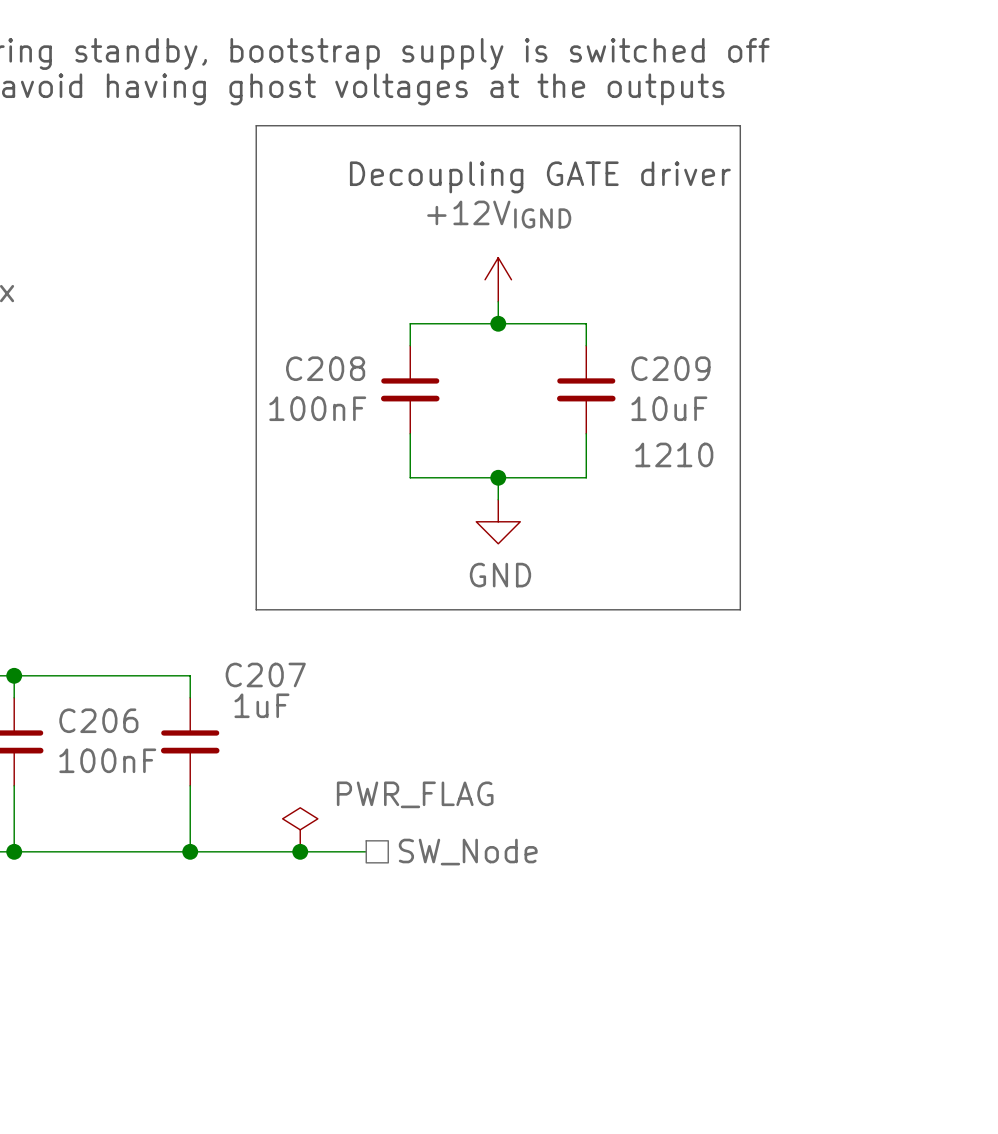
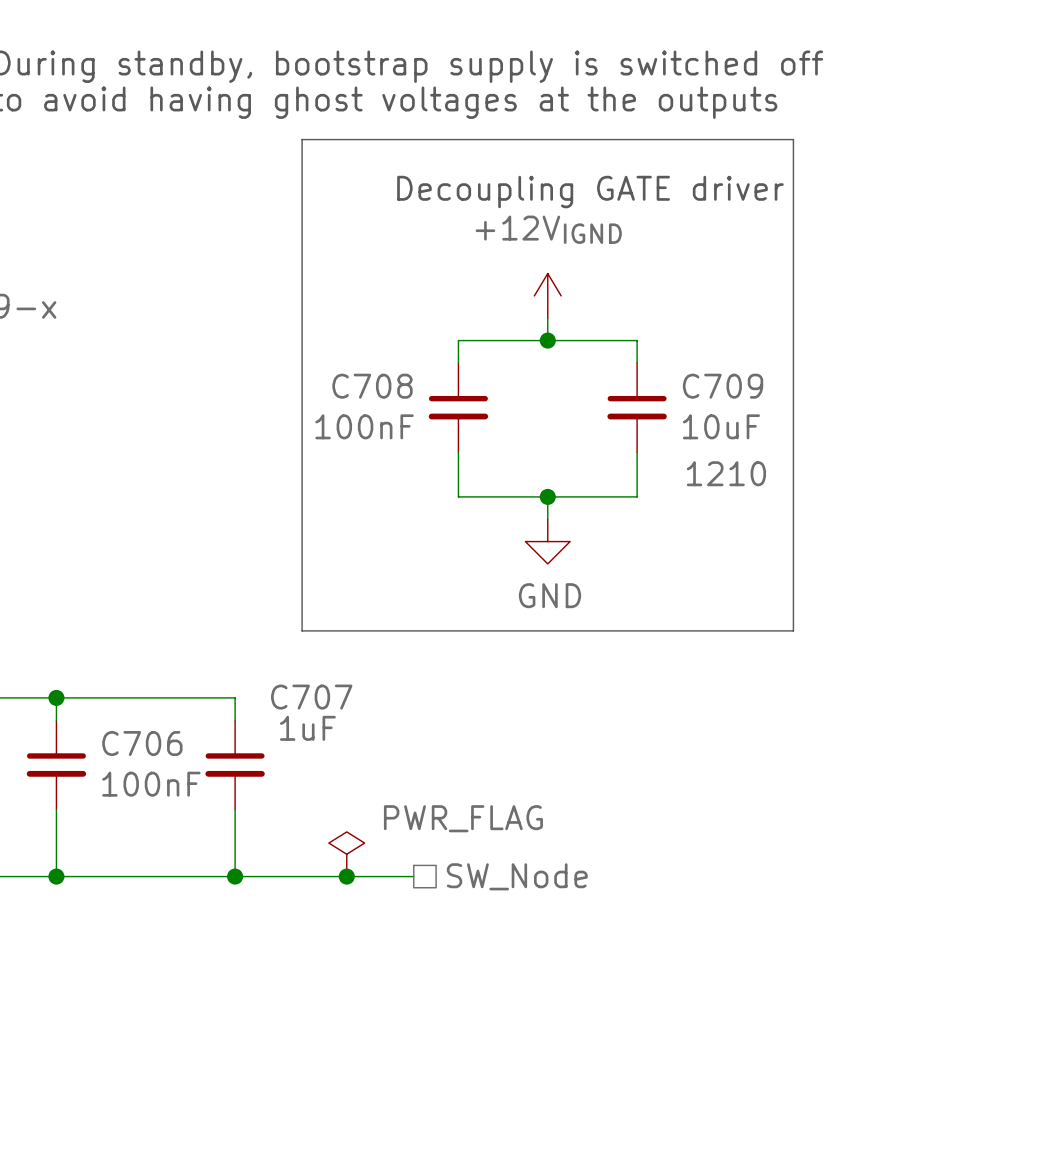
C208 name: C208 (325, 368) -> C708 (372, 386)
C209 name: C209 (670, 368) -> C709 (723, 386)
C207 name: C207 (265, 674) -> C707 (311, 697)
C206 name: C206 (98, 720) -> C706 (142, 743)

